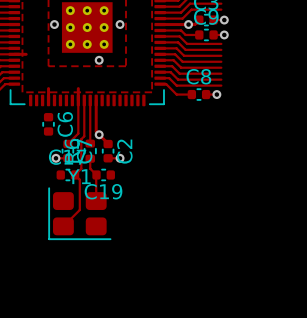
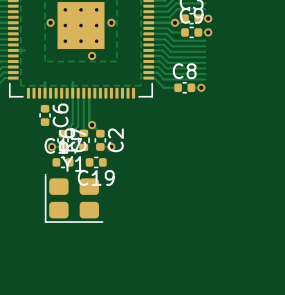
track: (90, 158) (90, 168) (96, 174) (96, 201) -> none
track: (81, 160) (81, 168) (75, 174) (79, 179) (79, 209) (63, 226) -> none

